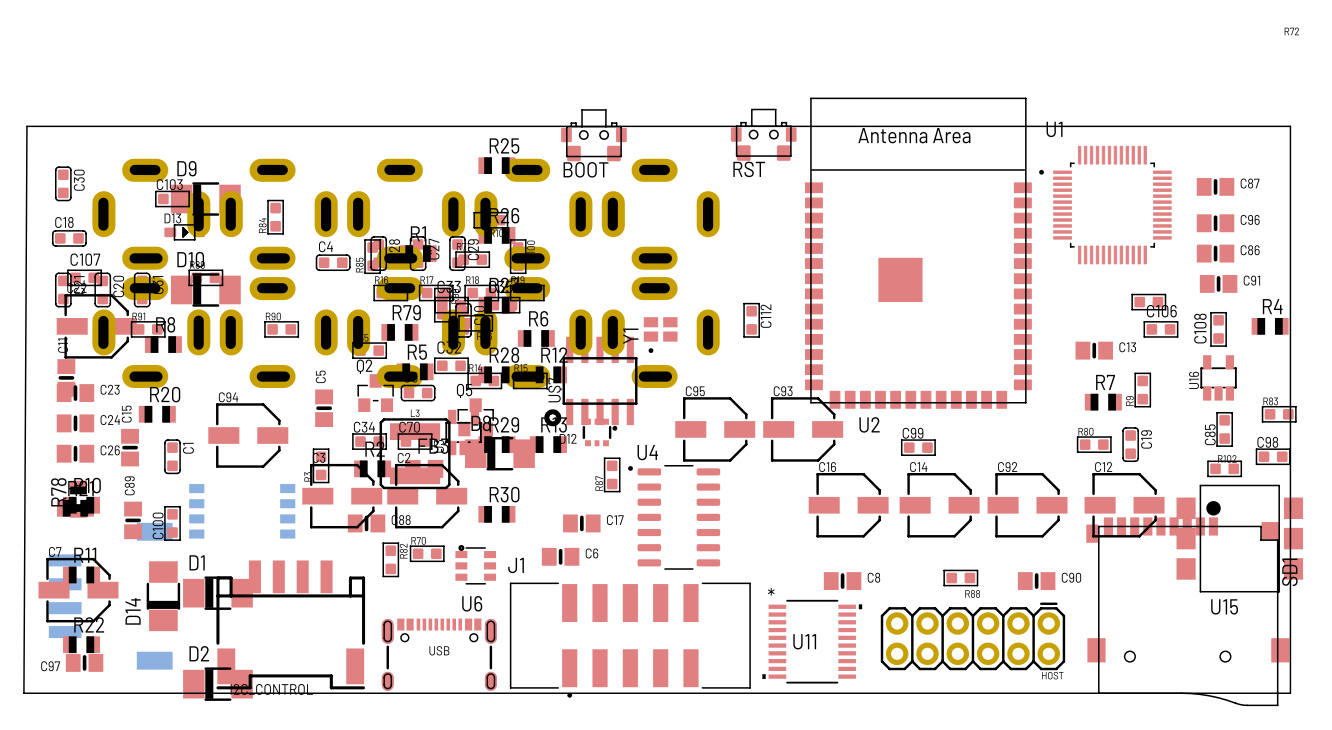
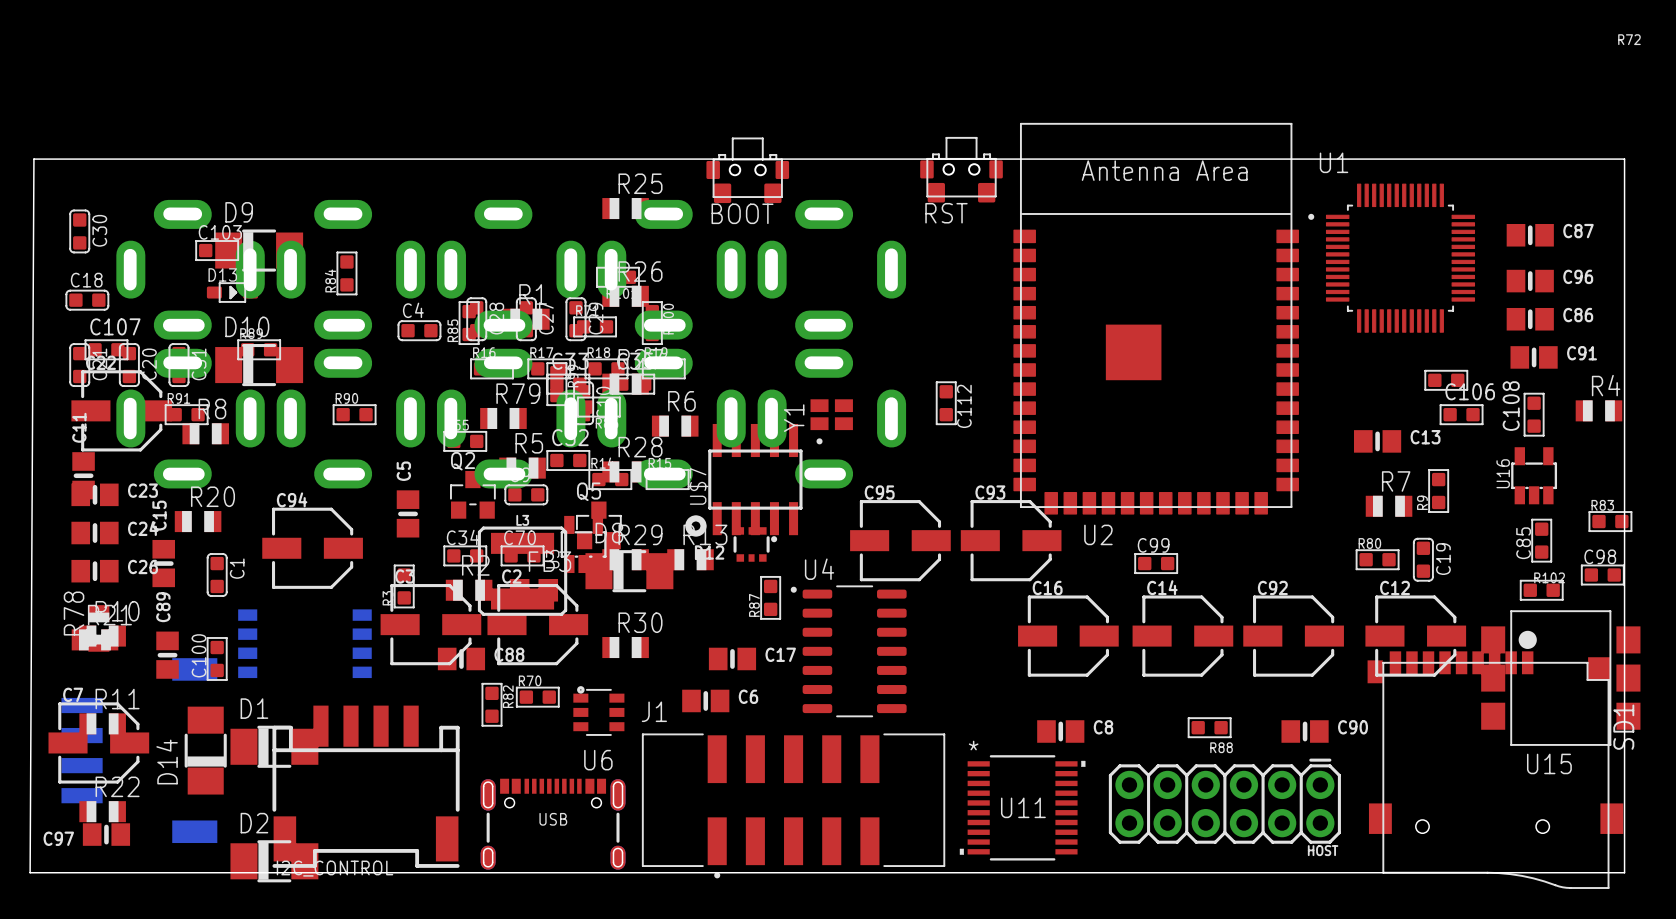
R12: (548, 374) -> none

